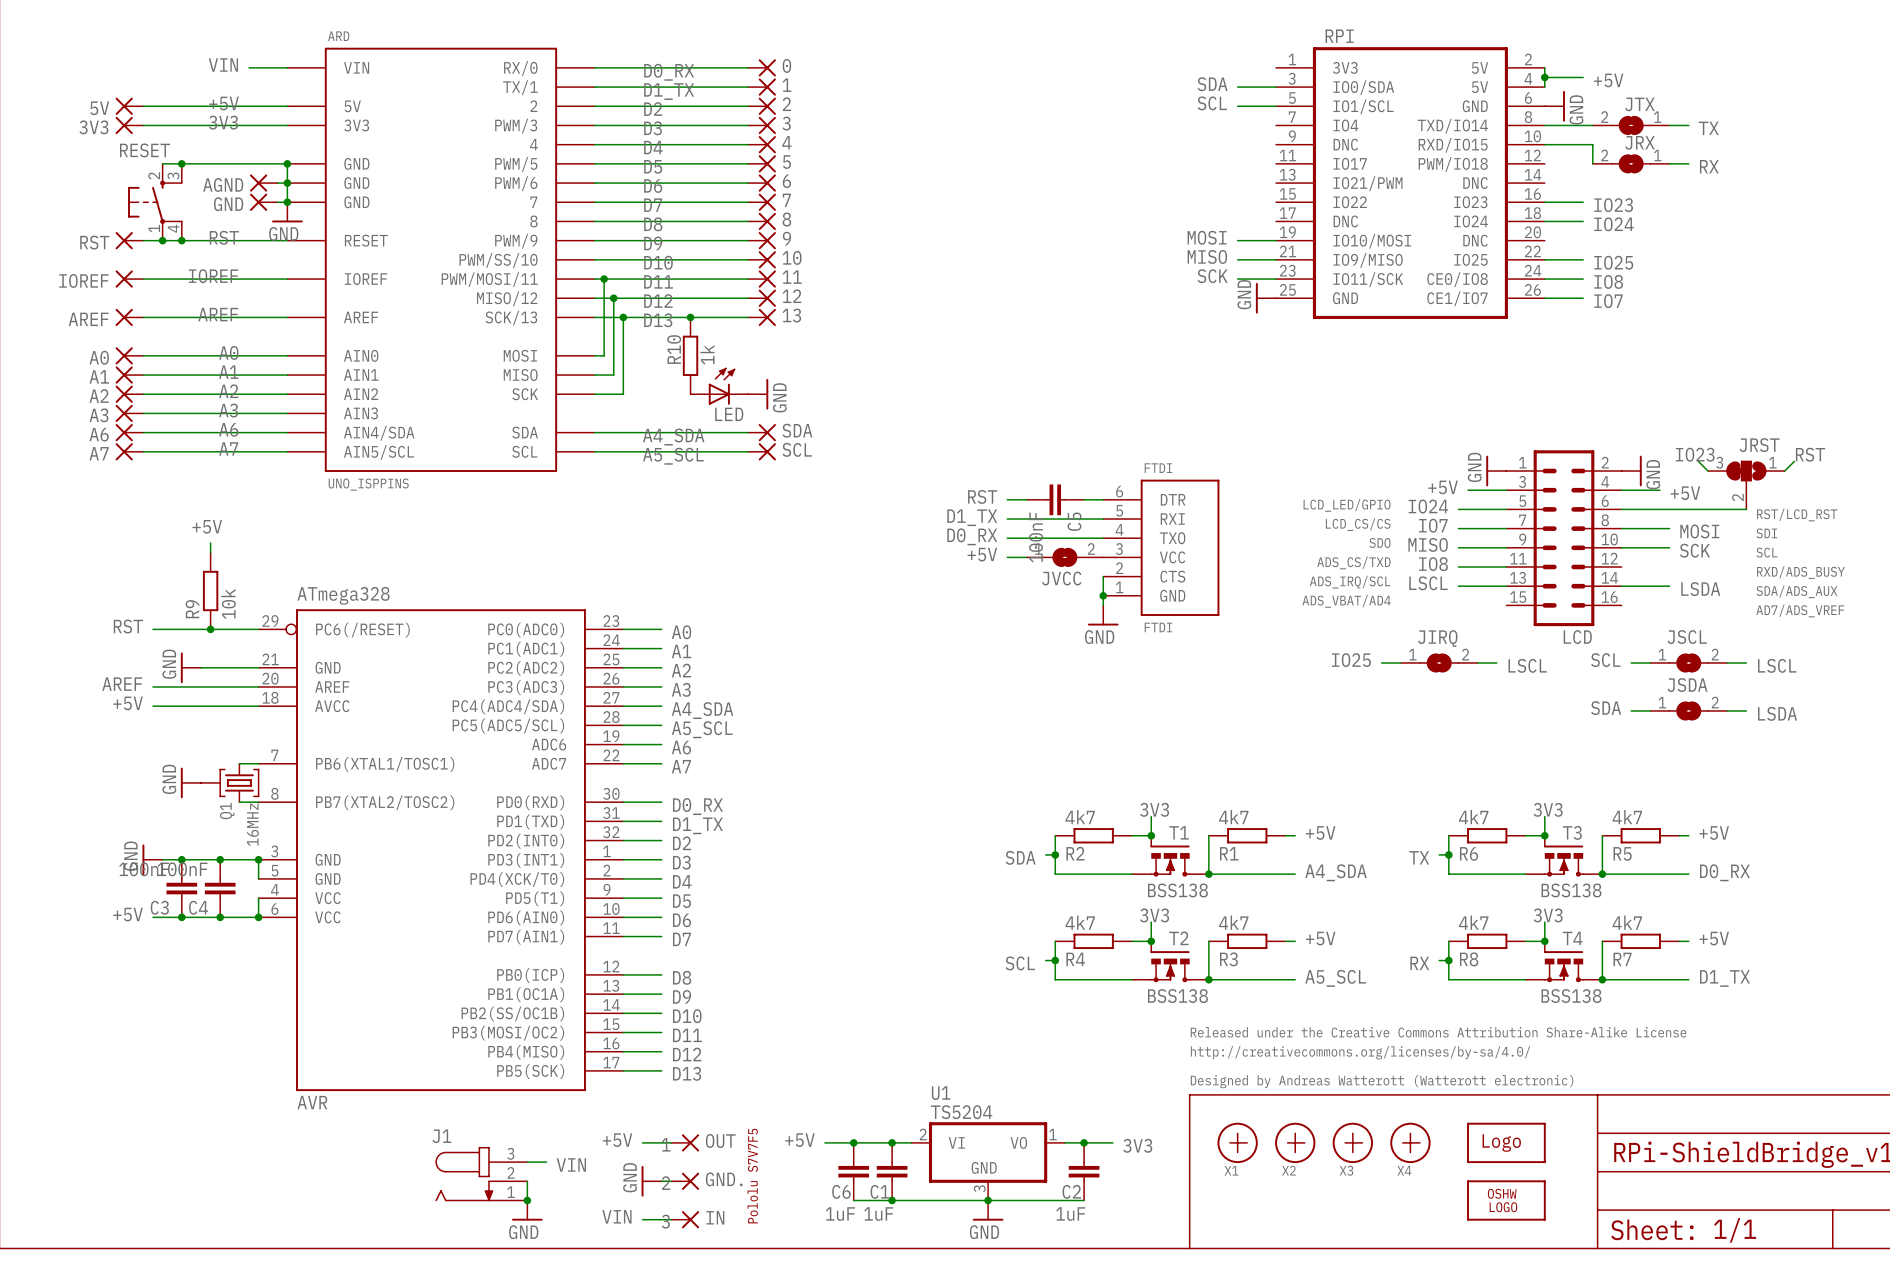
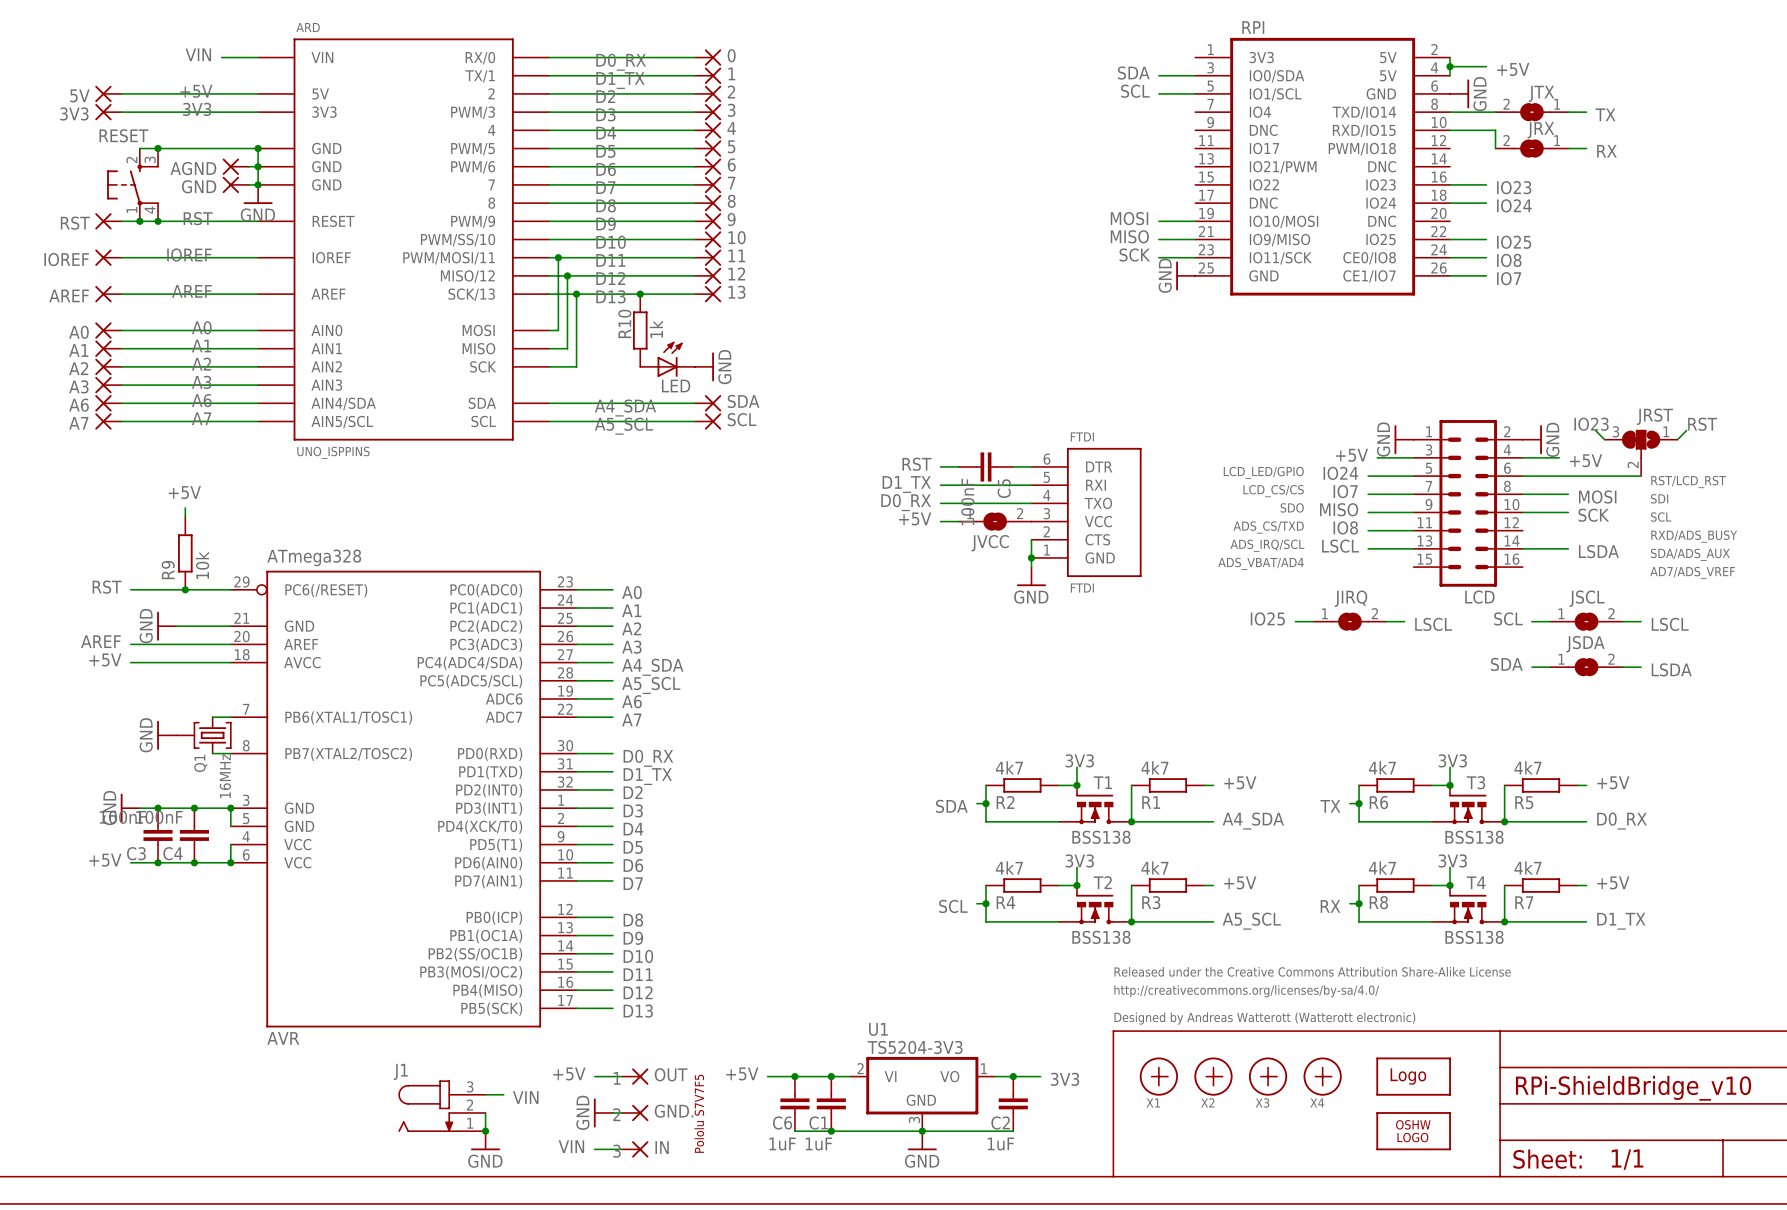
U1 value: TS5204 (961, 1112) -> TS5204-3V3 (915, 1047)

